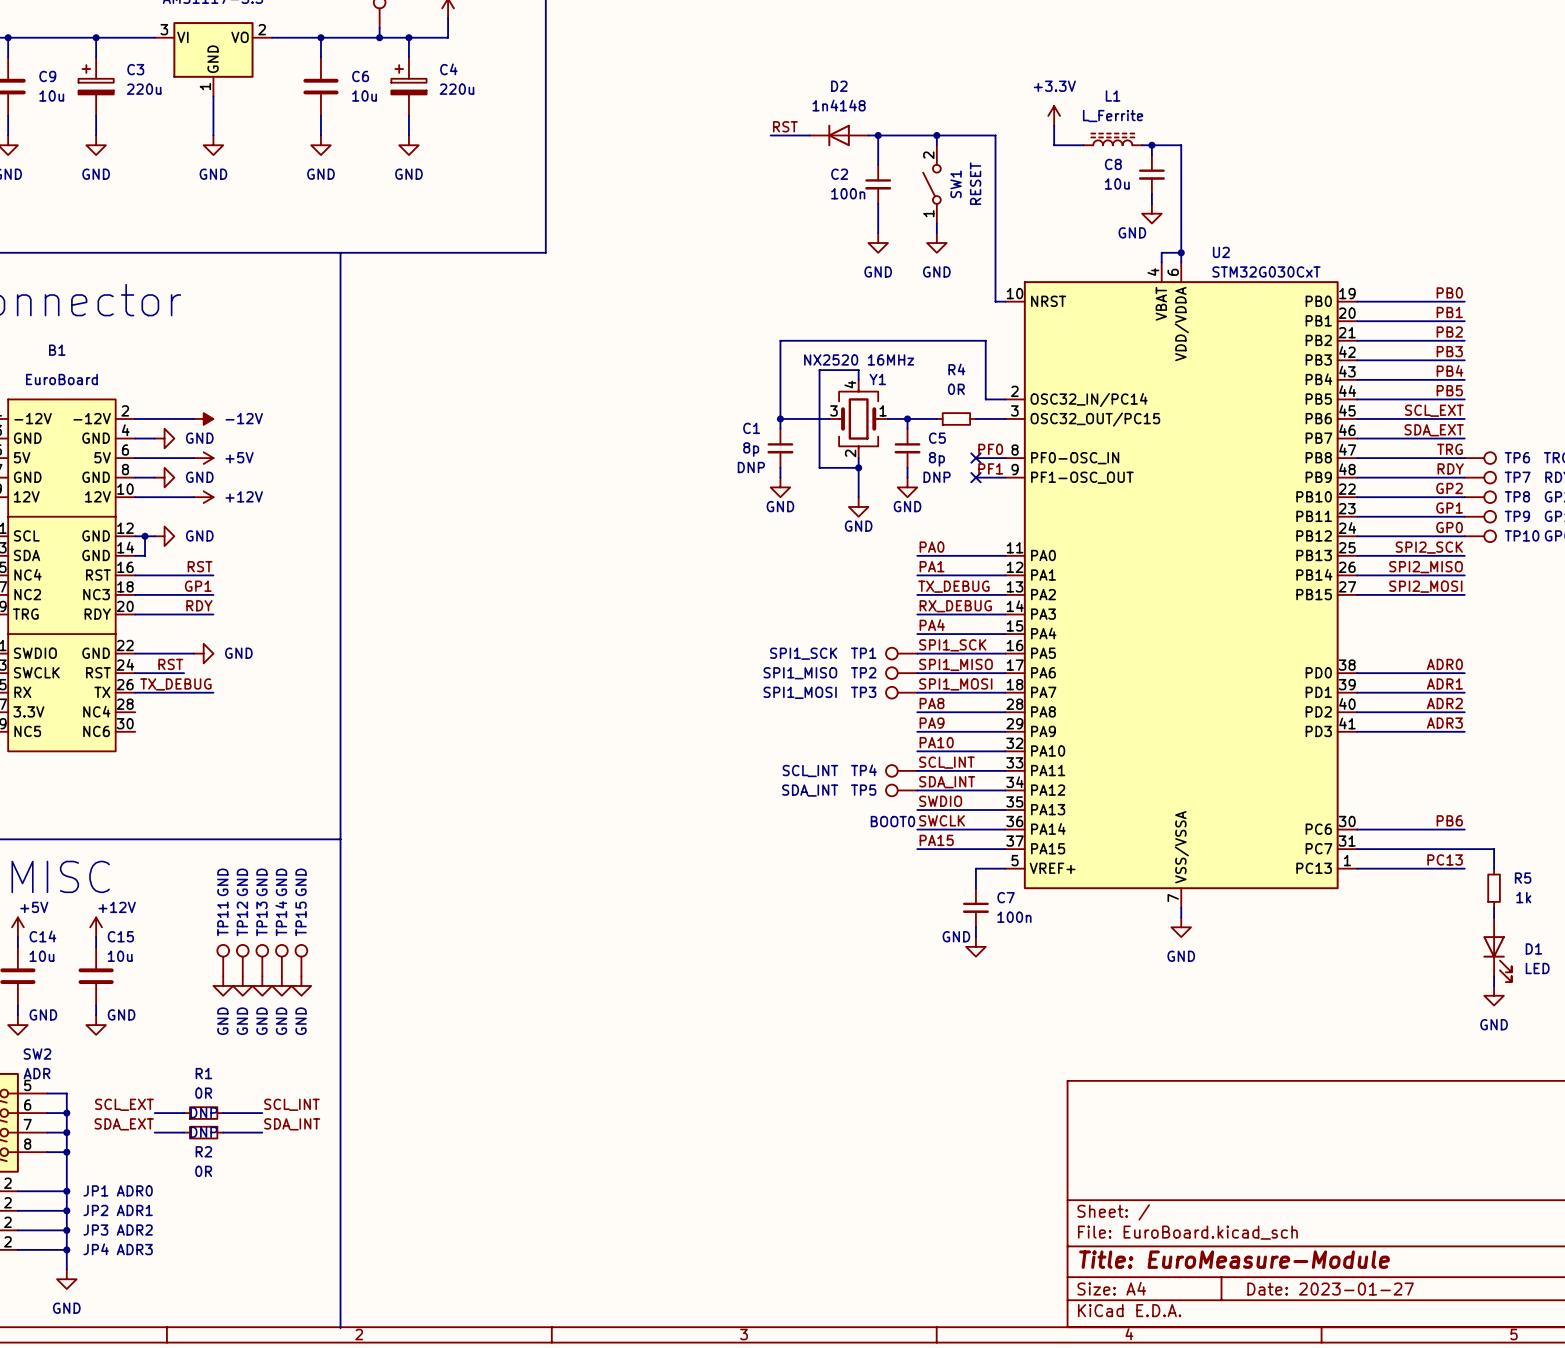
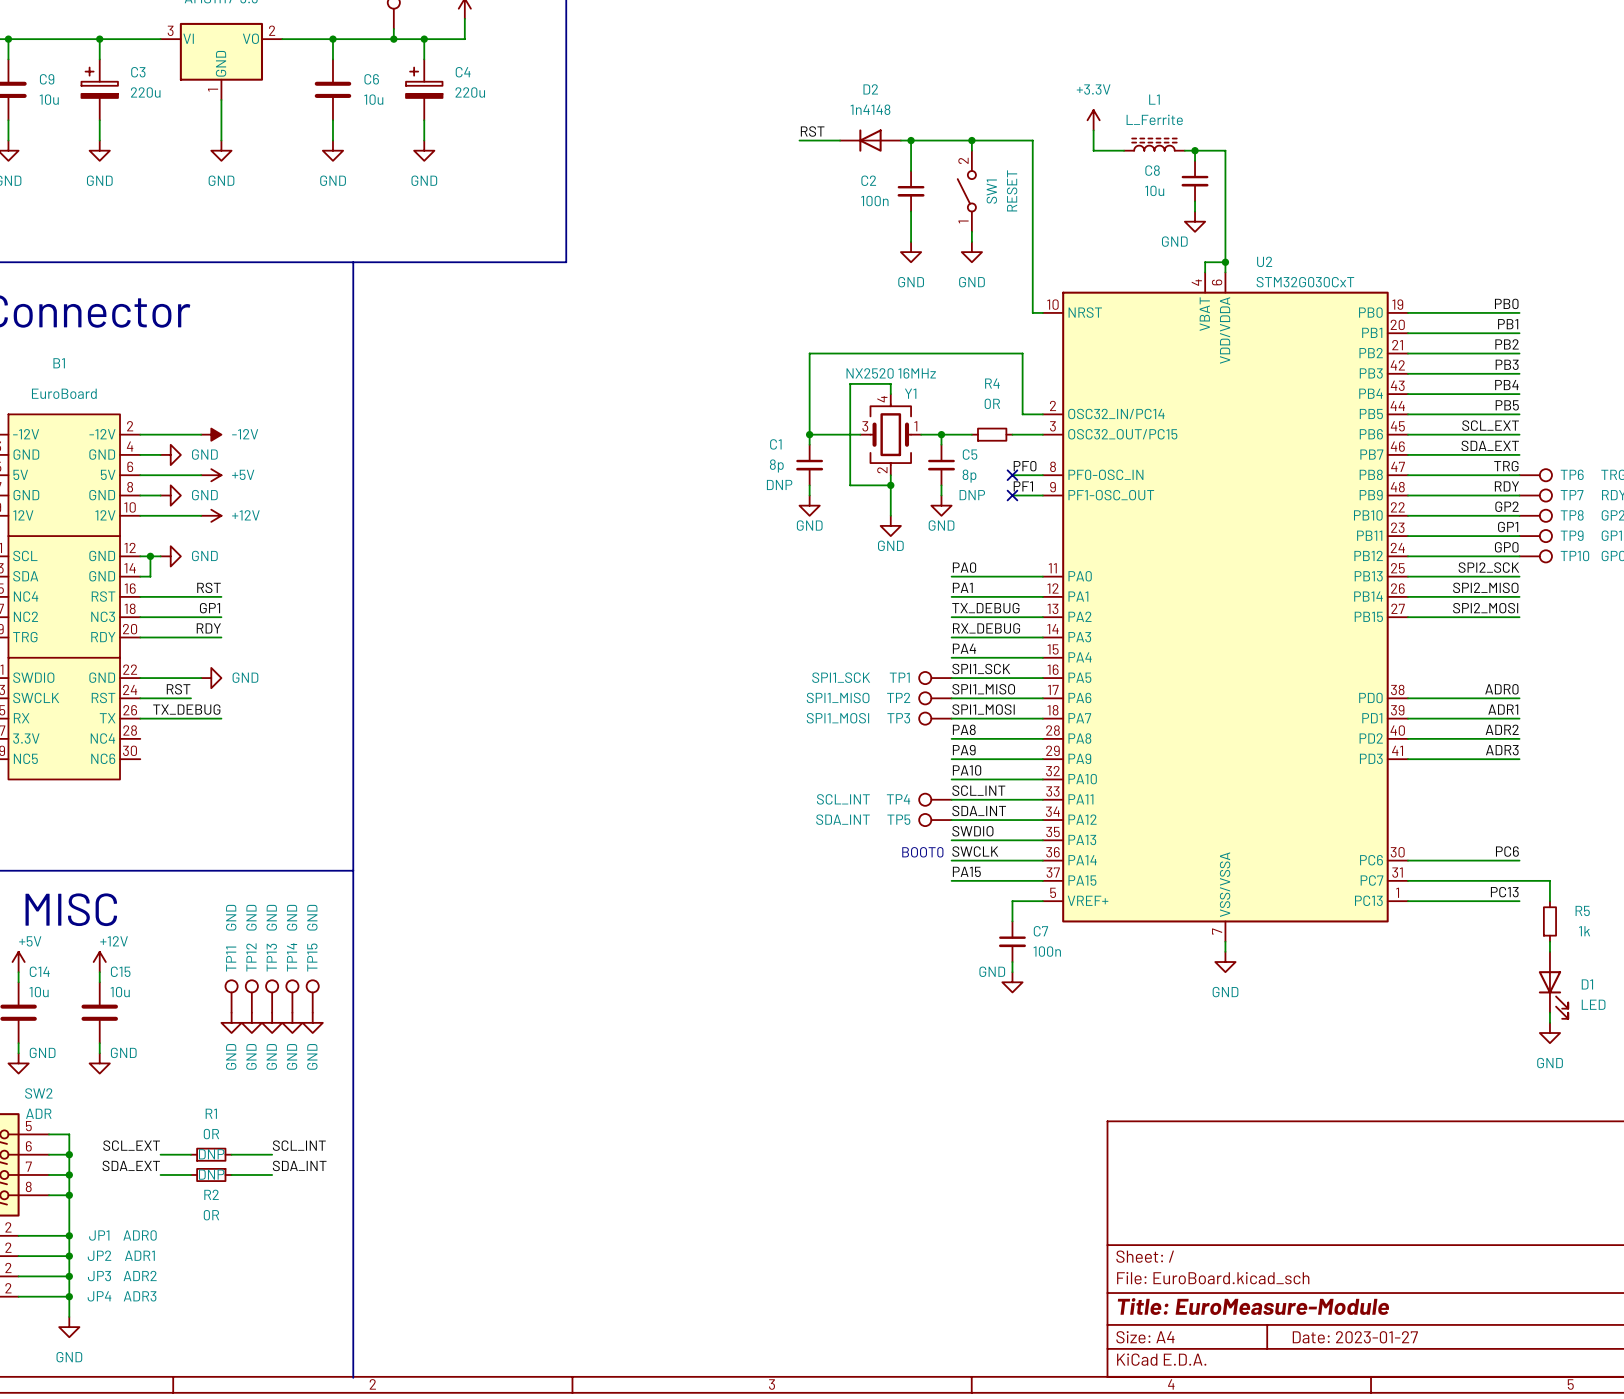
label: PB6 (1449, 820) -> PC6 (1507, 851)

